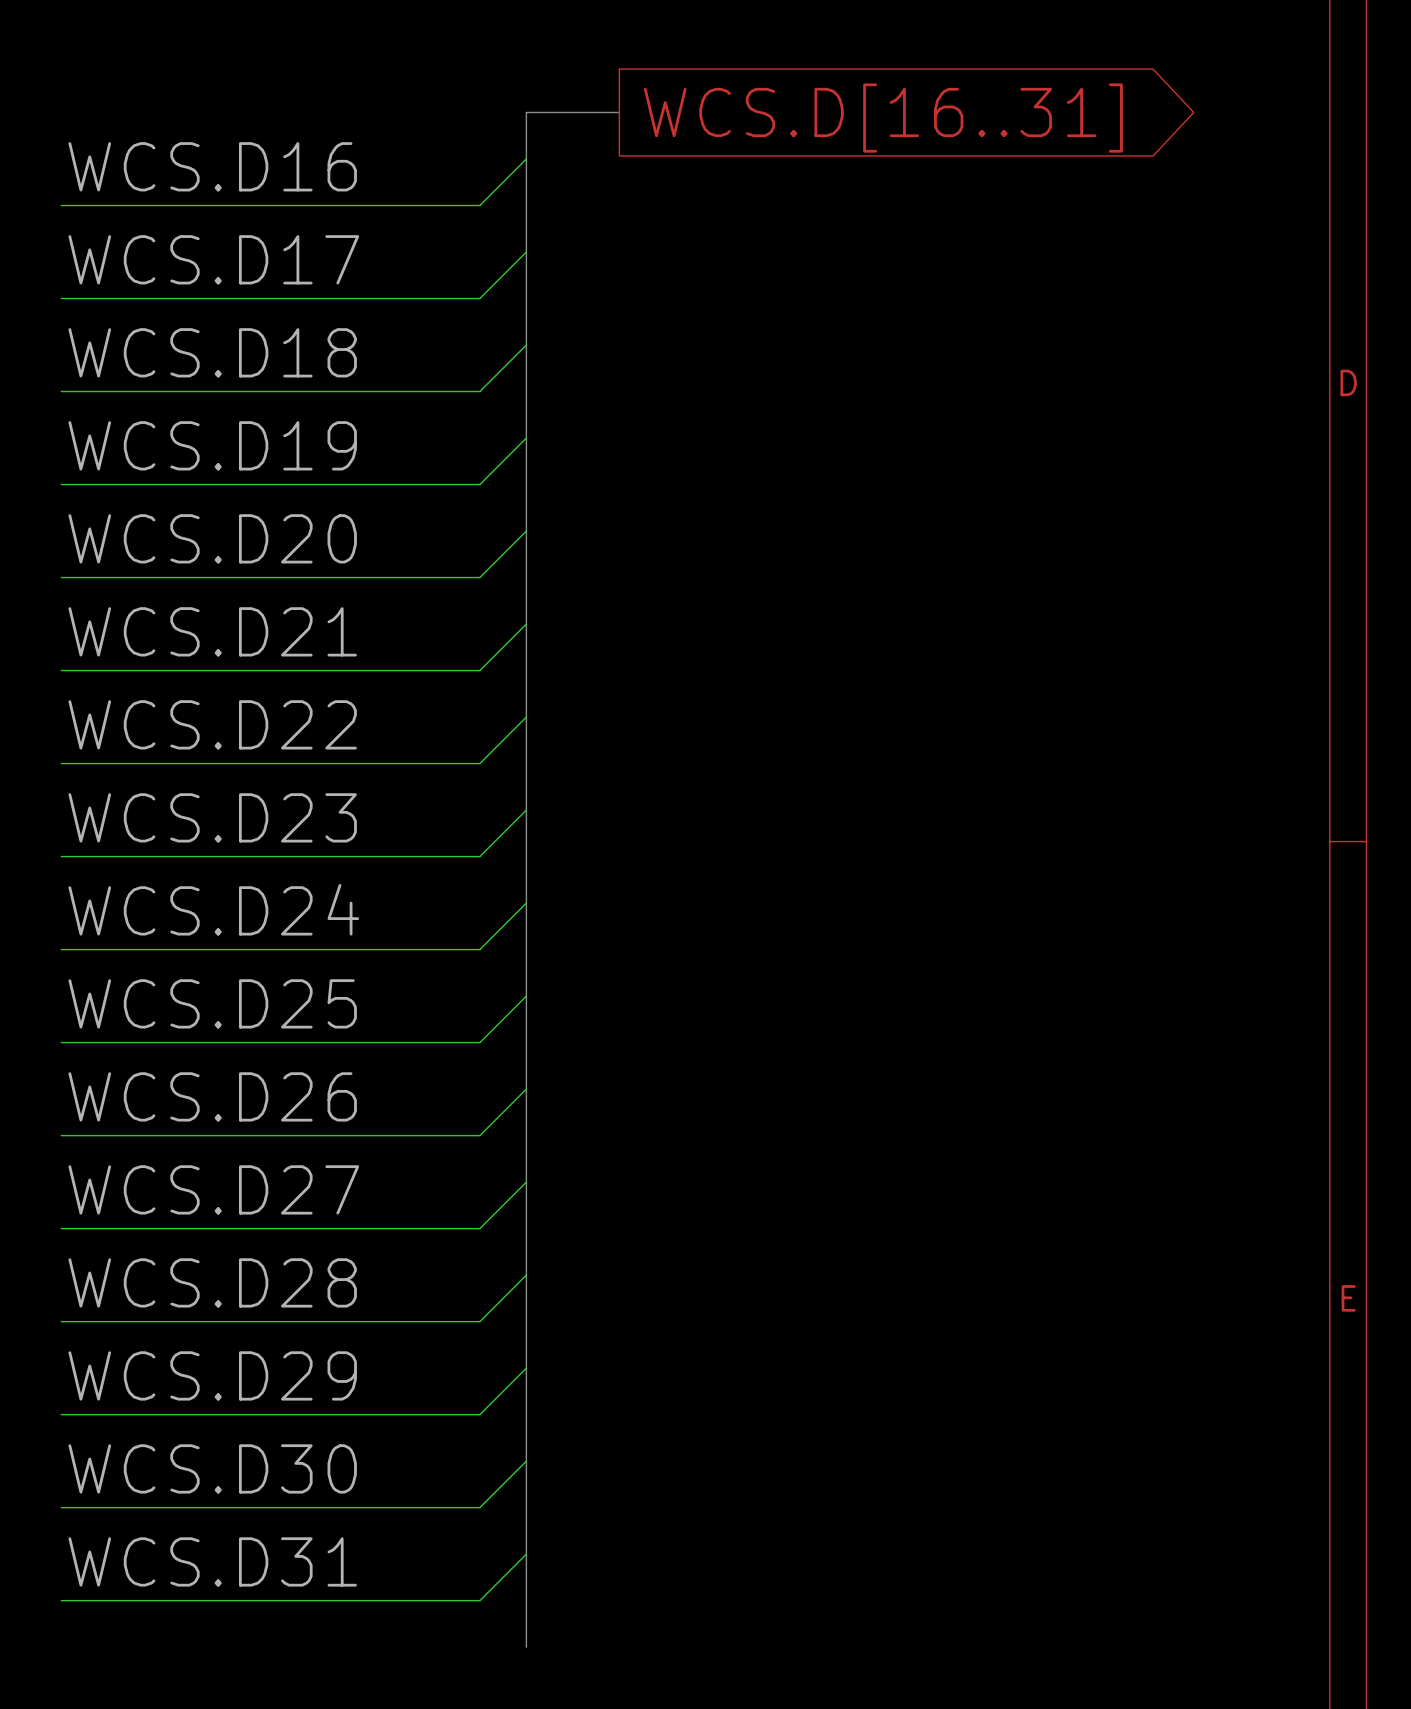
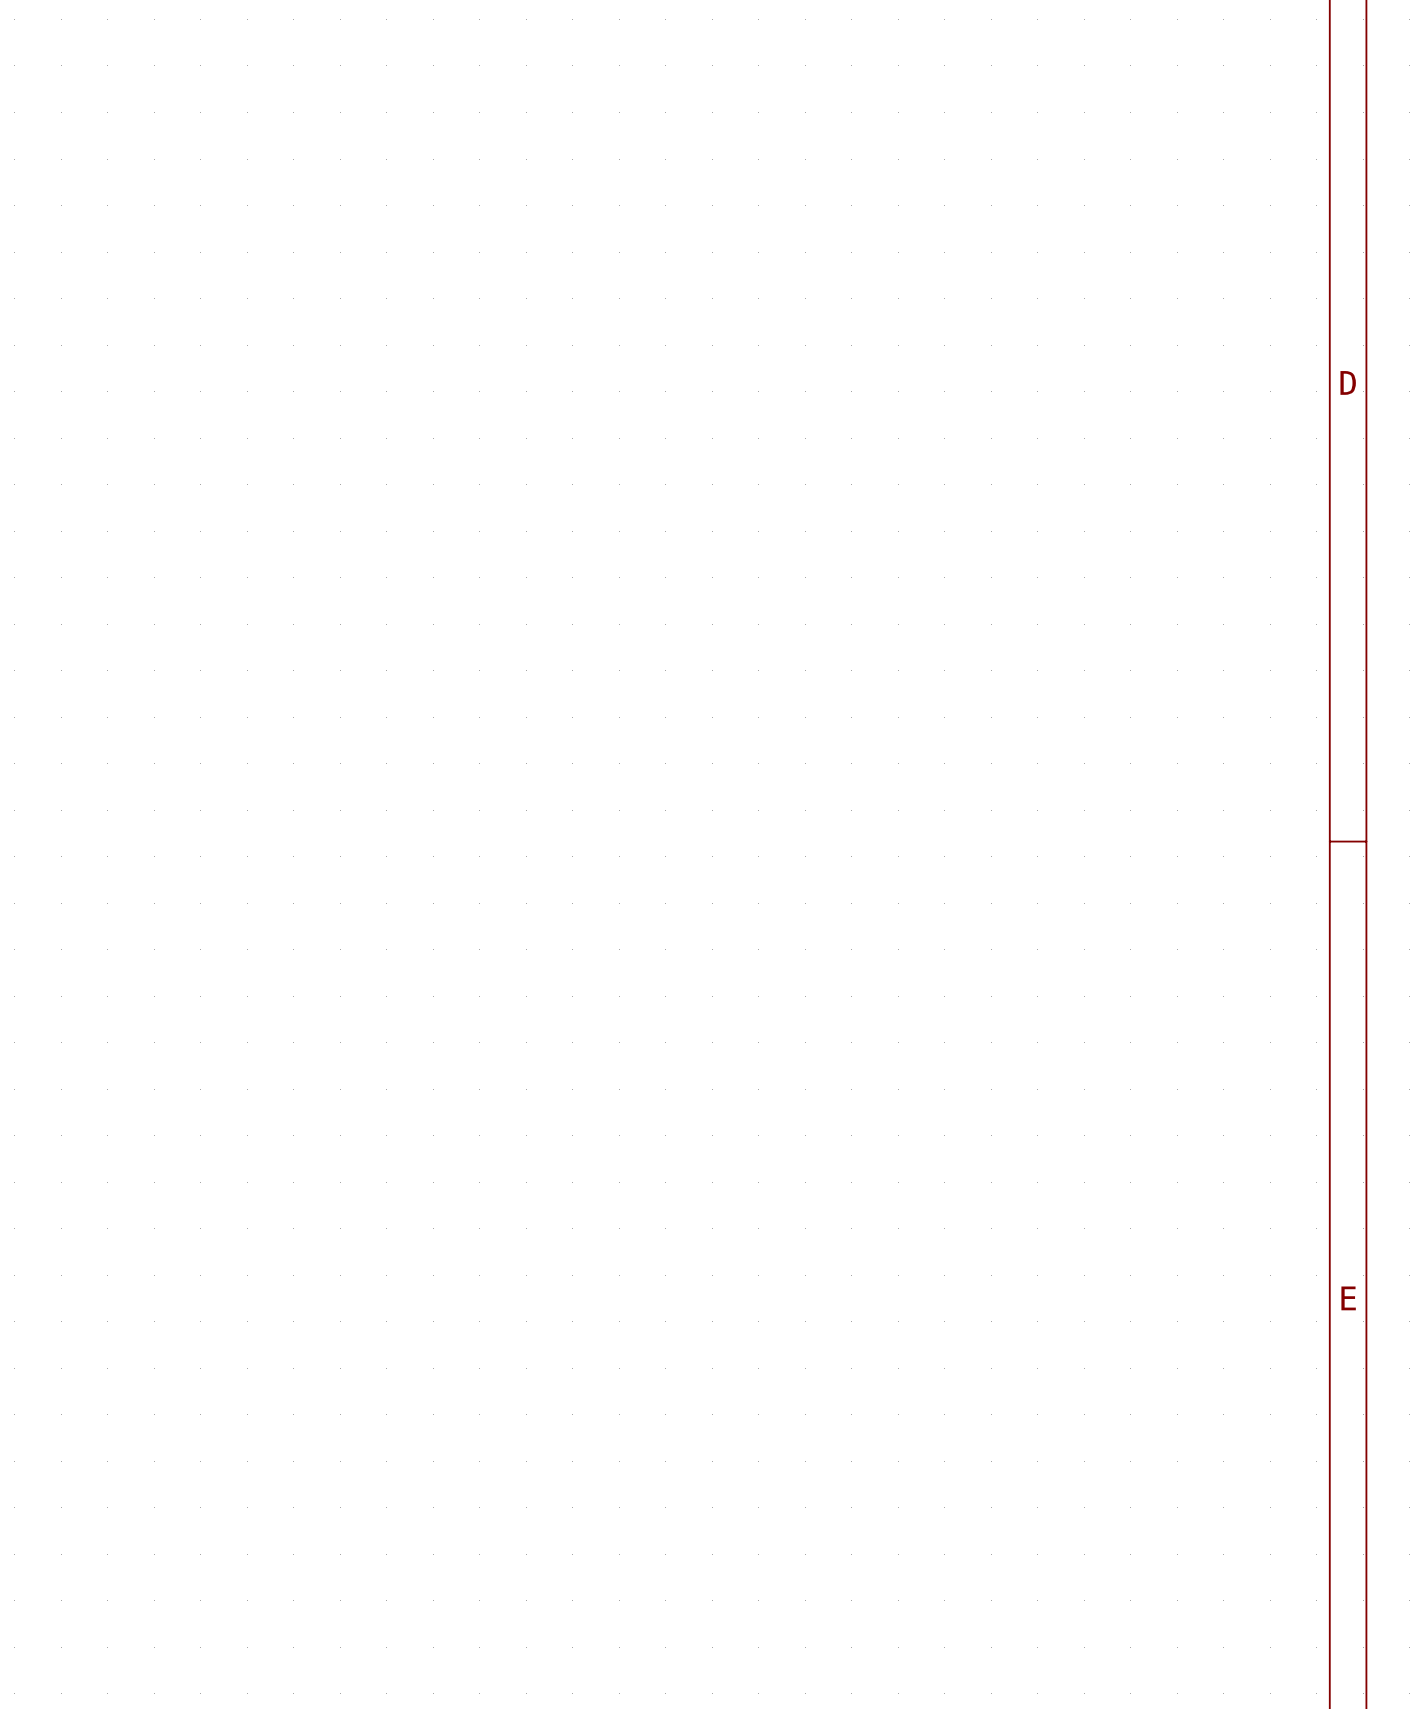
bus: (619, 112) (526, 112) (526, 1647) -> none
global label: WCS.D[16..31] (883, 118) -> none
wire: (526, 159) (479, 205) (61, 205) -> none
label: WCS.D16 (212, 166) -> none
wire: (526, 252) (479, 298) (61, 298) -> none
label: WCS.D17 (213, 259) -> none
wire: (526, 345) (479, 391) (61, 391) -> none
label: WCS.D18 (212, 352) -> none
wire: (526, 438) (479, 484) (61, 484) -> none
label: WCS.D19 (212, 445) -> none
wire: (526, 531) (479, 577) (61, 577) -> none
label: WCS.D20 (212, 538) -> none
wire: (526, 624) (479, 670) (61, 670) -> none
label: WCS.D21 (212, 631) -> none
wire: (526, 717) (479, 763) (61, 763) -> none
label: WCS.D22 (212, 724) -> none
wire: (526, 810) (479, 856) (61, 856) -> none
label: WCS.D23 (212, 817) -> none
wire: (526, 903) (479, 949) (61, 949) -> none
label: WCS.D24 (213, 909) -> none
wire: (526, 996) (479, 1042) (61, 1042) -> none
label: WCS.D25 (212, 1003) -> none
wire: (526, 1089) (479, 1135) (61, 1135) -> none
label: WCS.D26 (212, 1096) -> none
wire: (526, 1182) (479, 1228) (61, 1228) -> none
label: WCS.D27 (213, 1189) -> none
wire: (526, 1275) (479, 1321) (61, 1321) -> none
label: WCS.D28 (212, 1282) -> none
wire: (526, 1368) (479, 1414) (61, 1414) -> none
label: WCS.D29 (212, 1375) -> none
wire: (526, 1461) (479, 1507) (61, 1507) -> none
label: WCS.D30 (212, 1468) -> none
wire: (526, 1554) (479, 1600) (61, 1600) -> none
label: WCS.D31 (212, 1561) -> none

